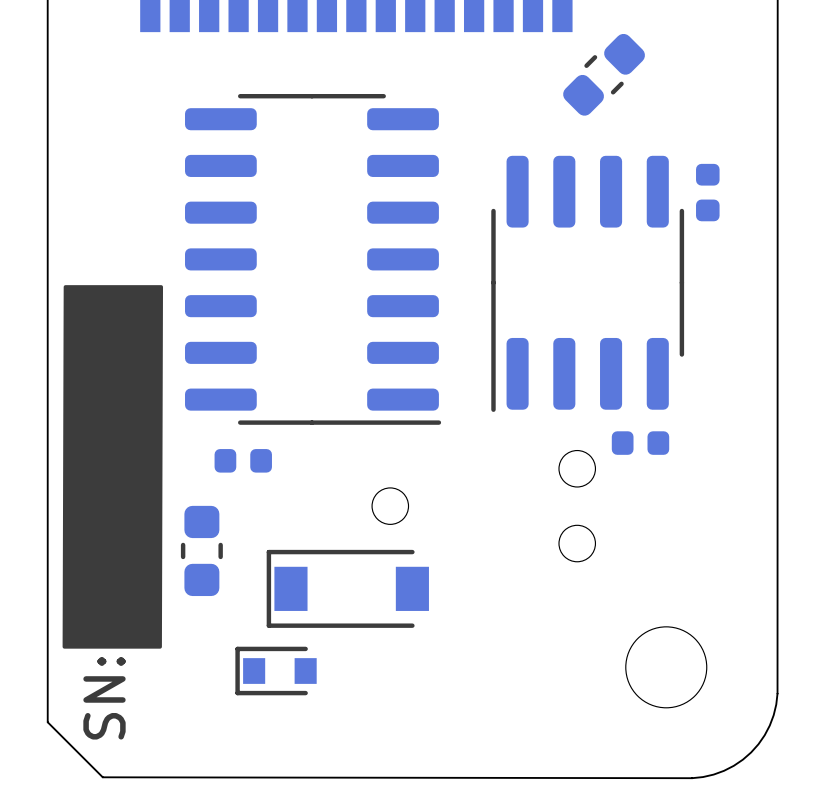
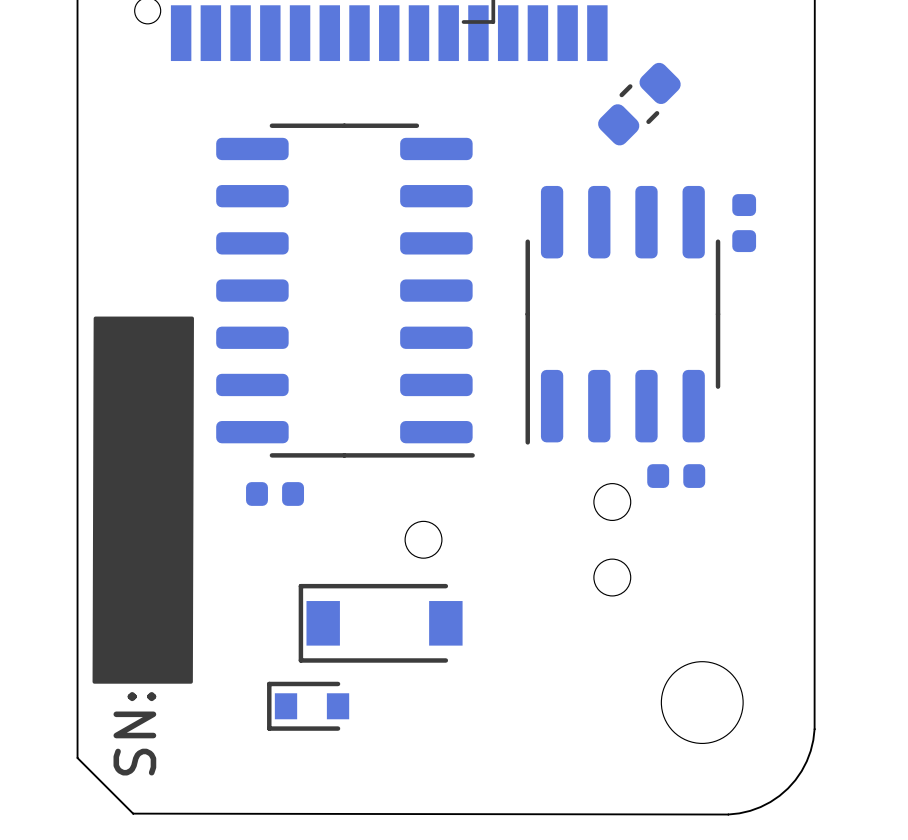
part: (201, 550) -> none

